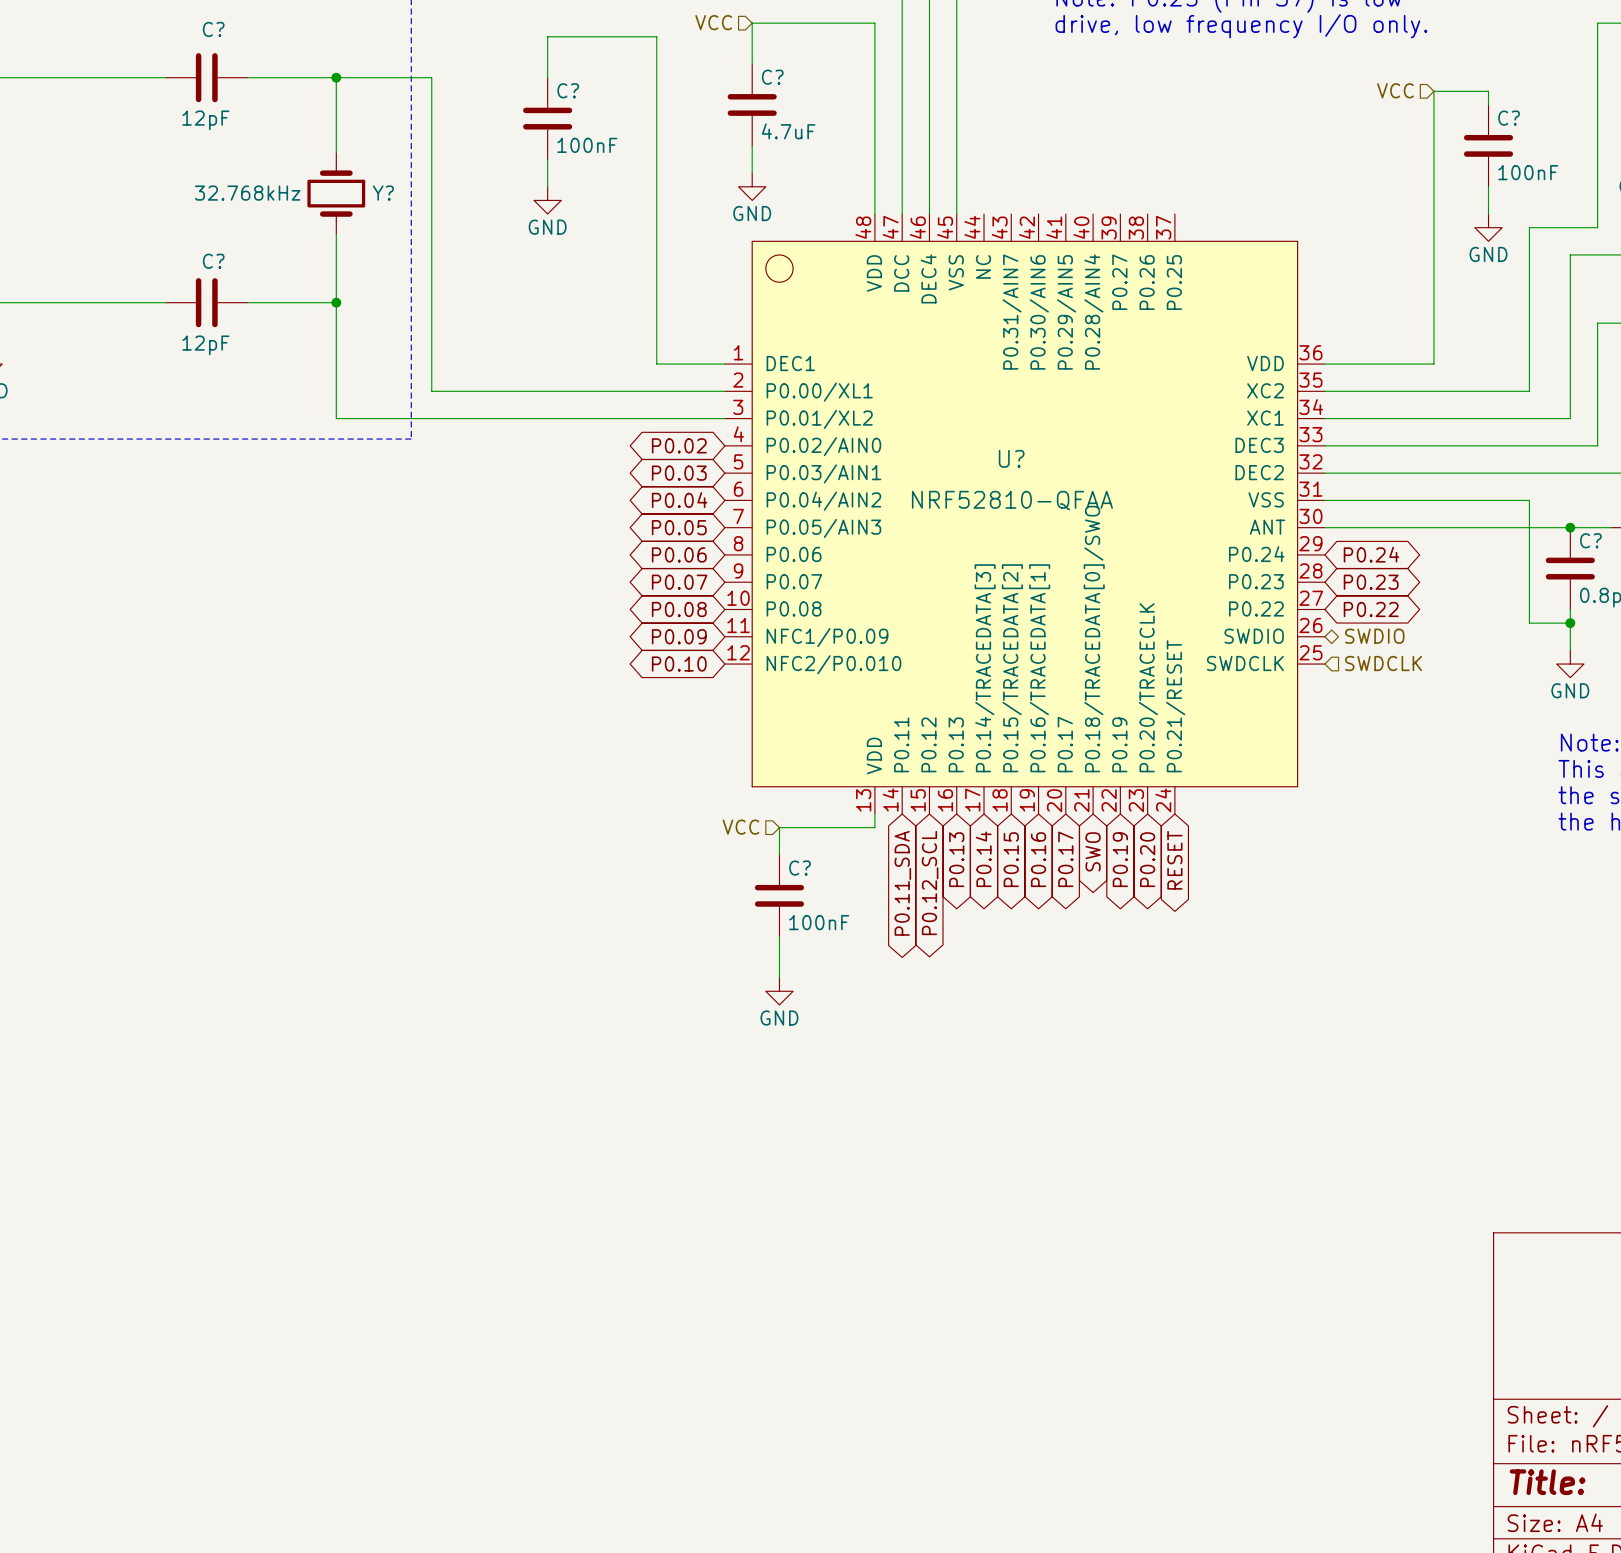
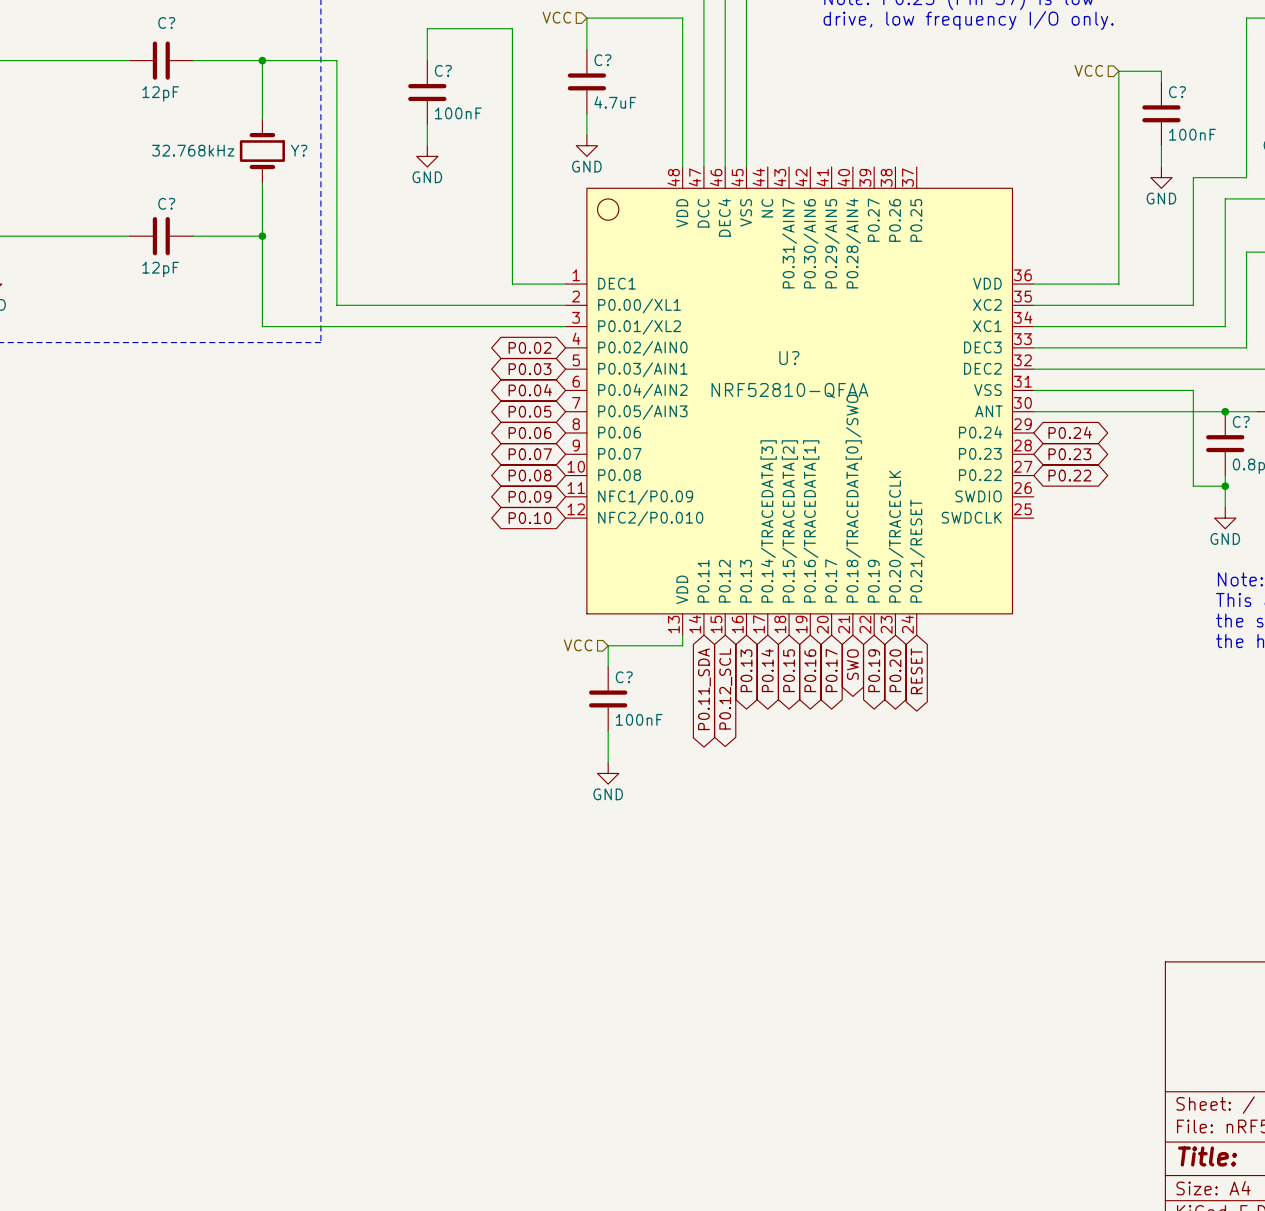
hierarchical label: SWDIO (1374, 636) -> none
hierarchical label: SWDCLK (1383, 663) -> none

